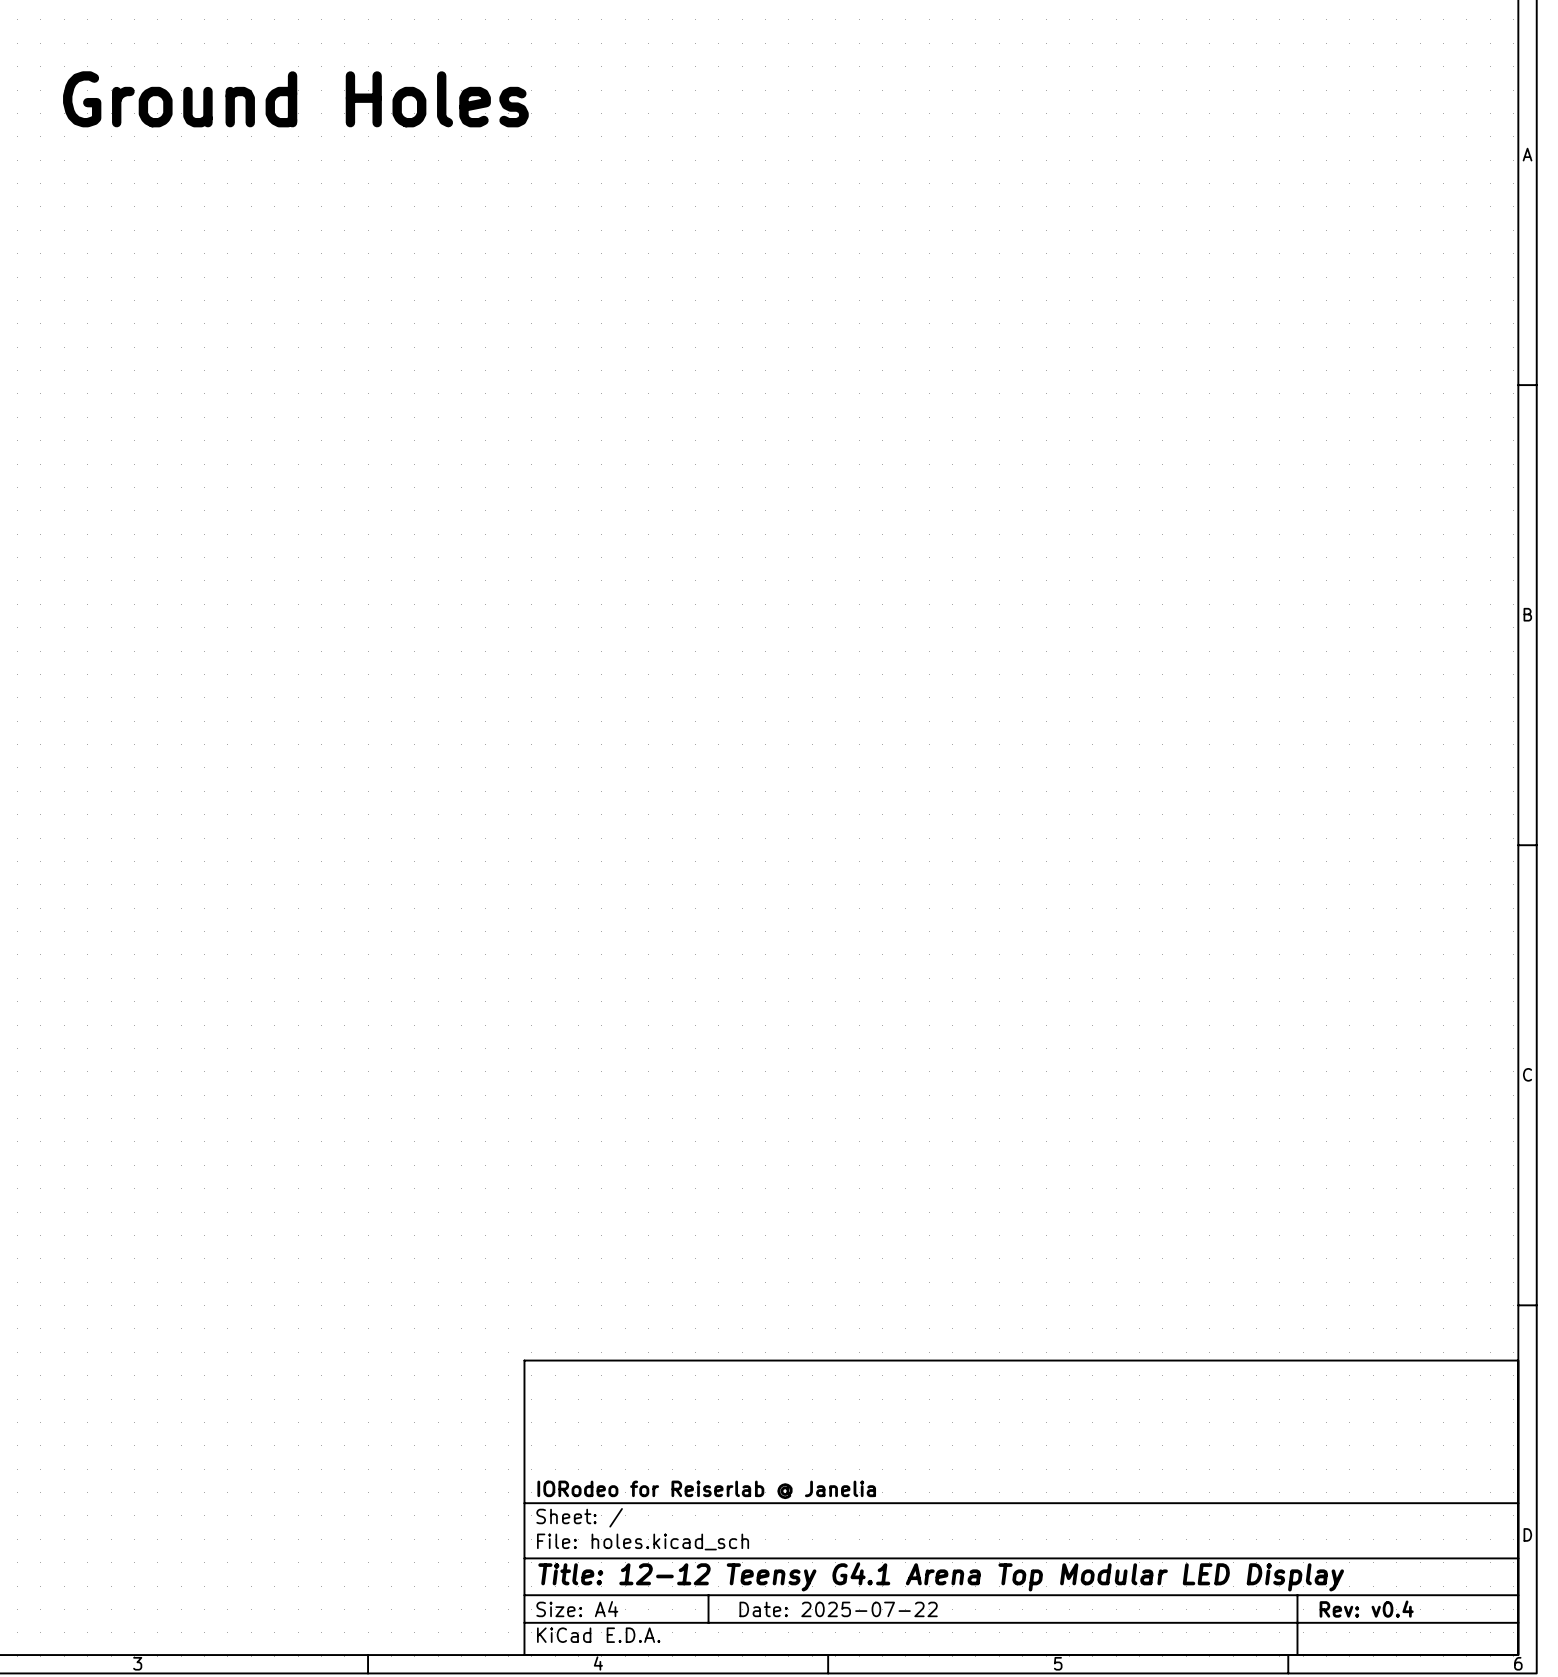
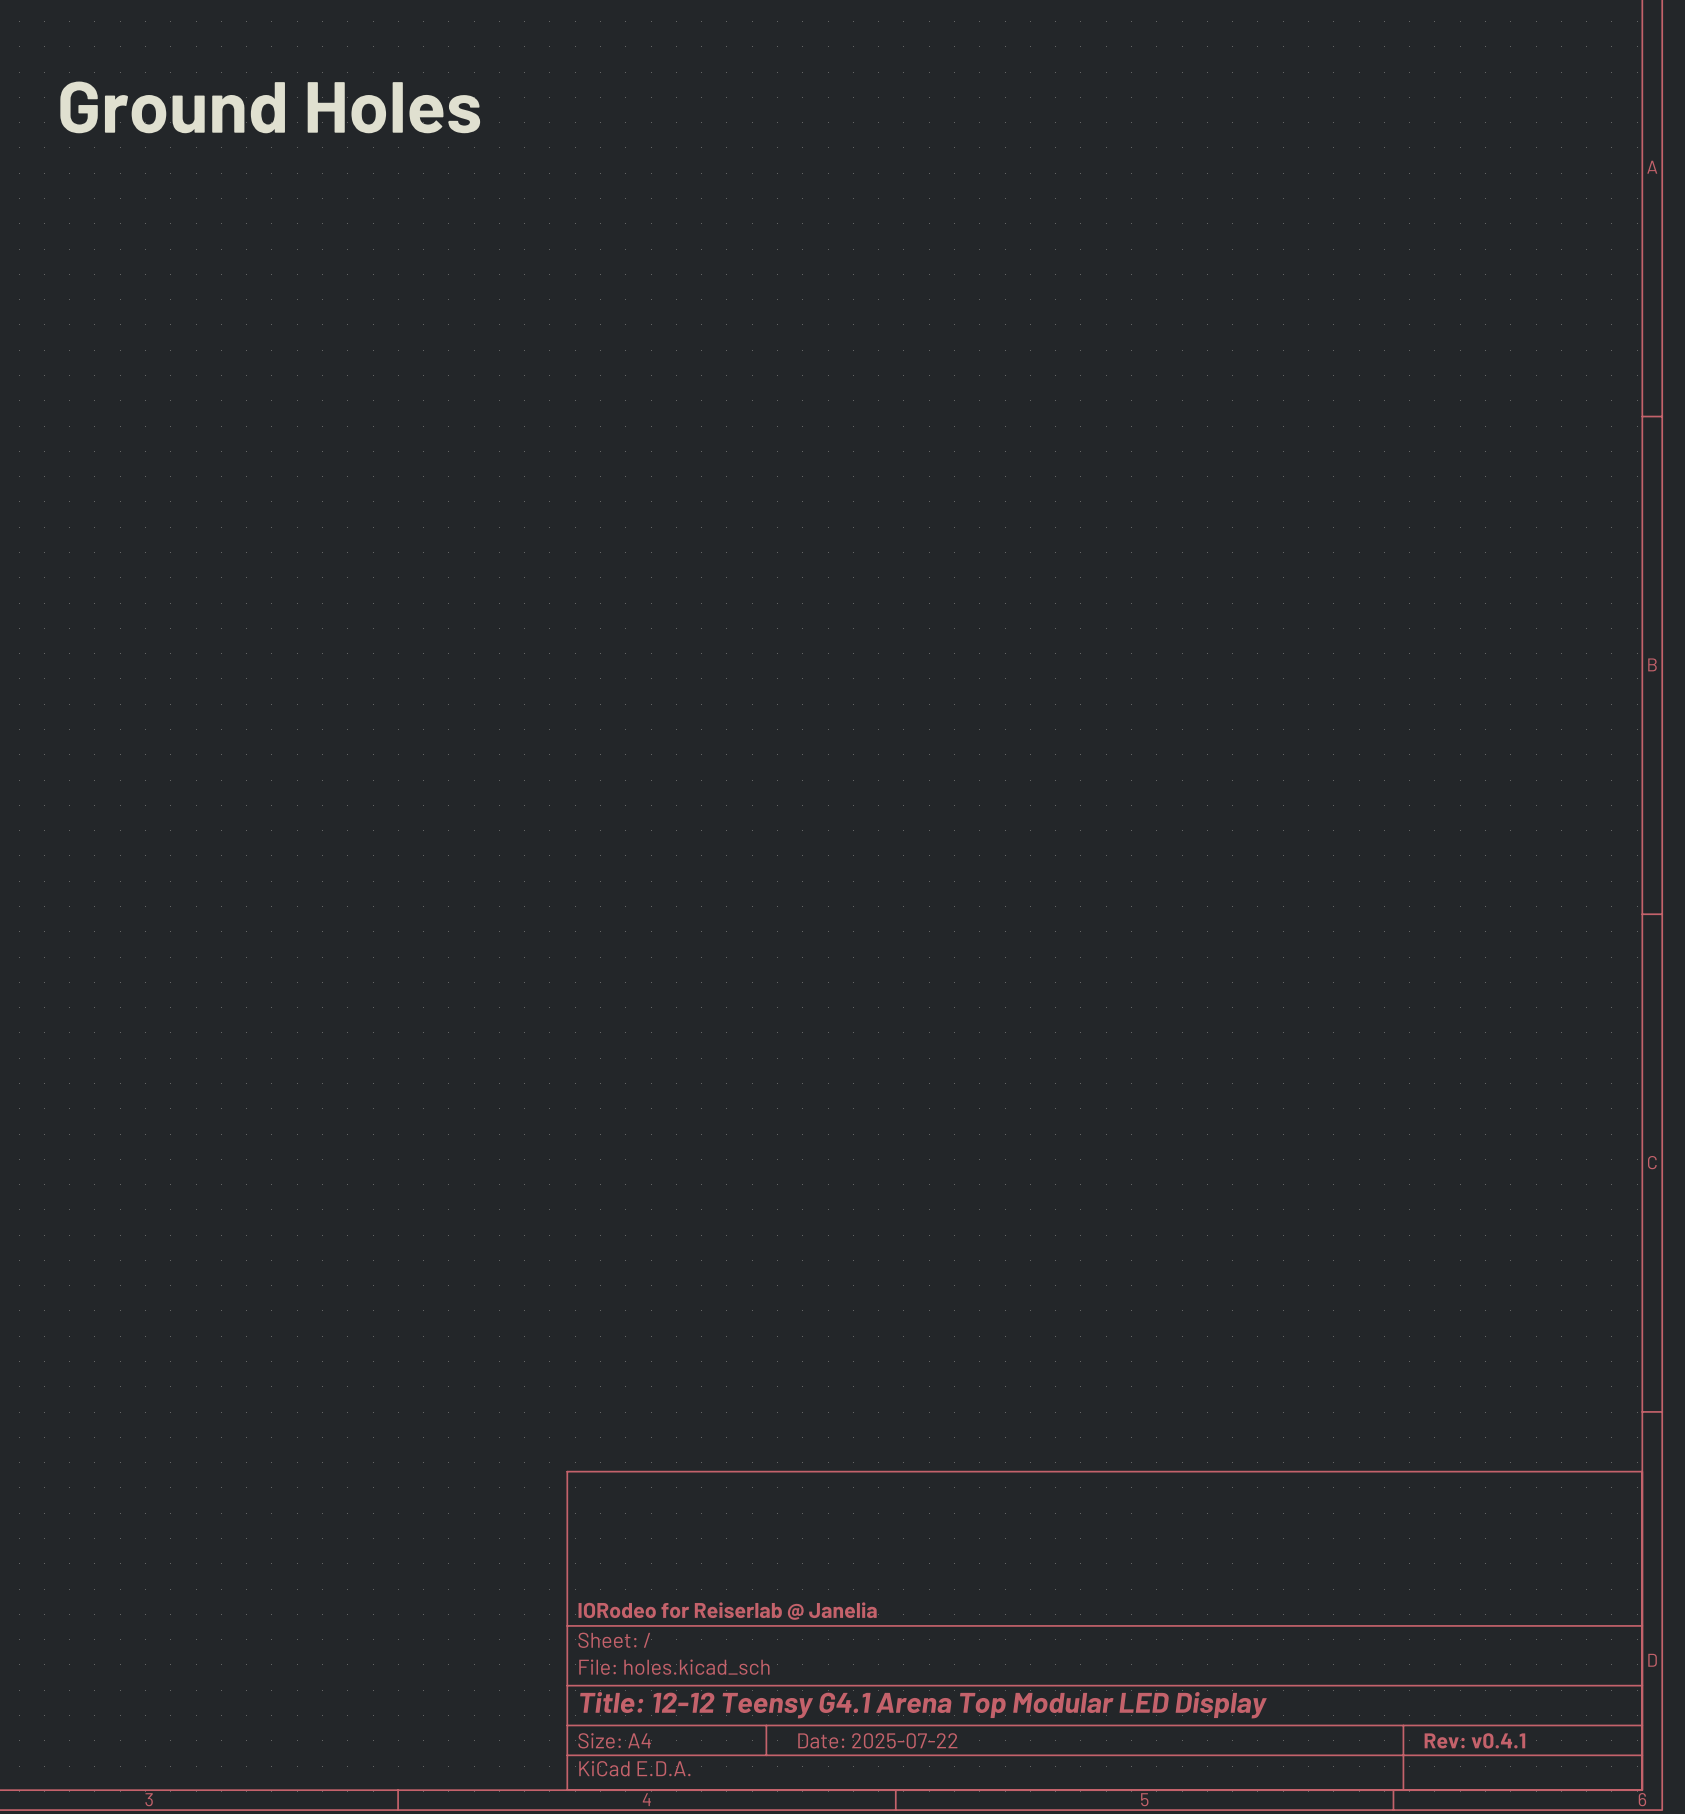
title block: Rev: v0.4 (1366, 1609) -> Rev: v0.4.1 (1474, 1740)

